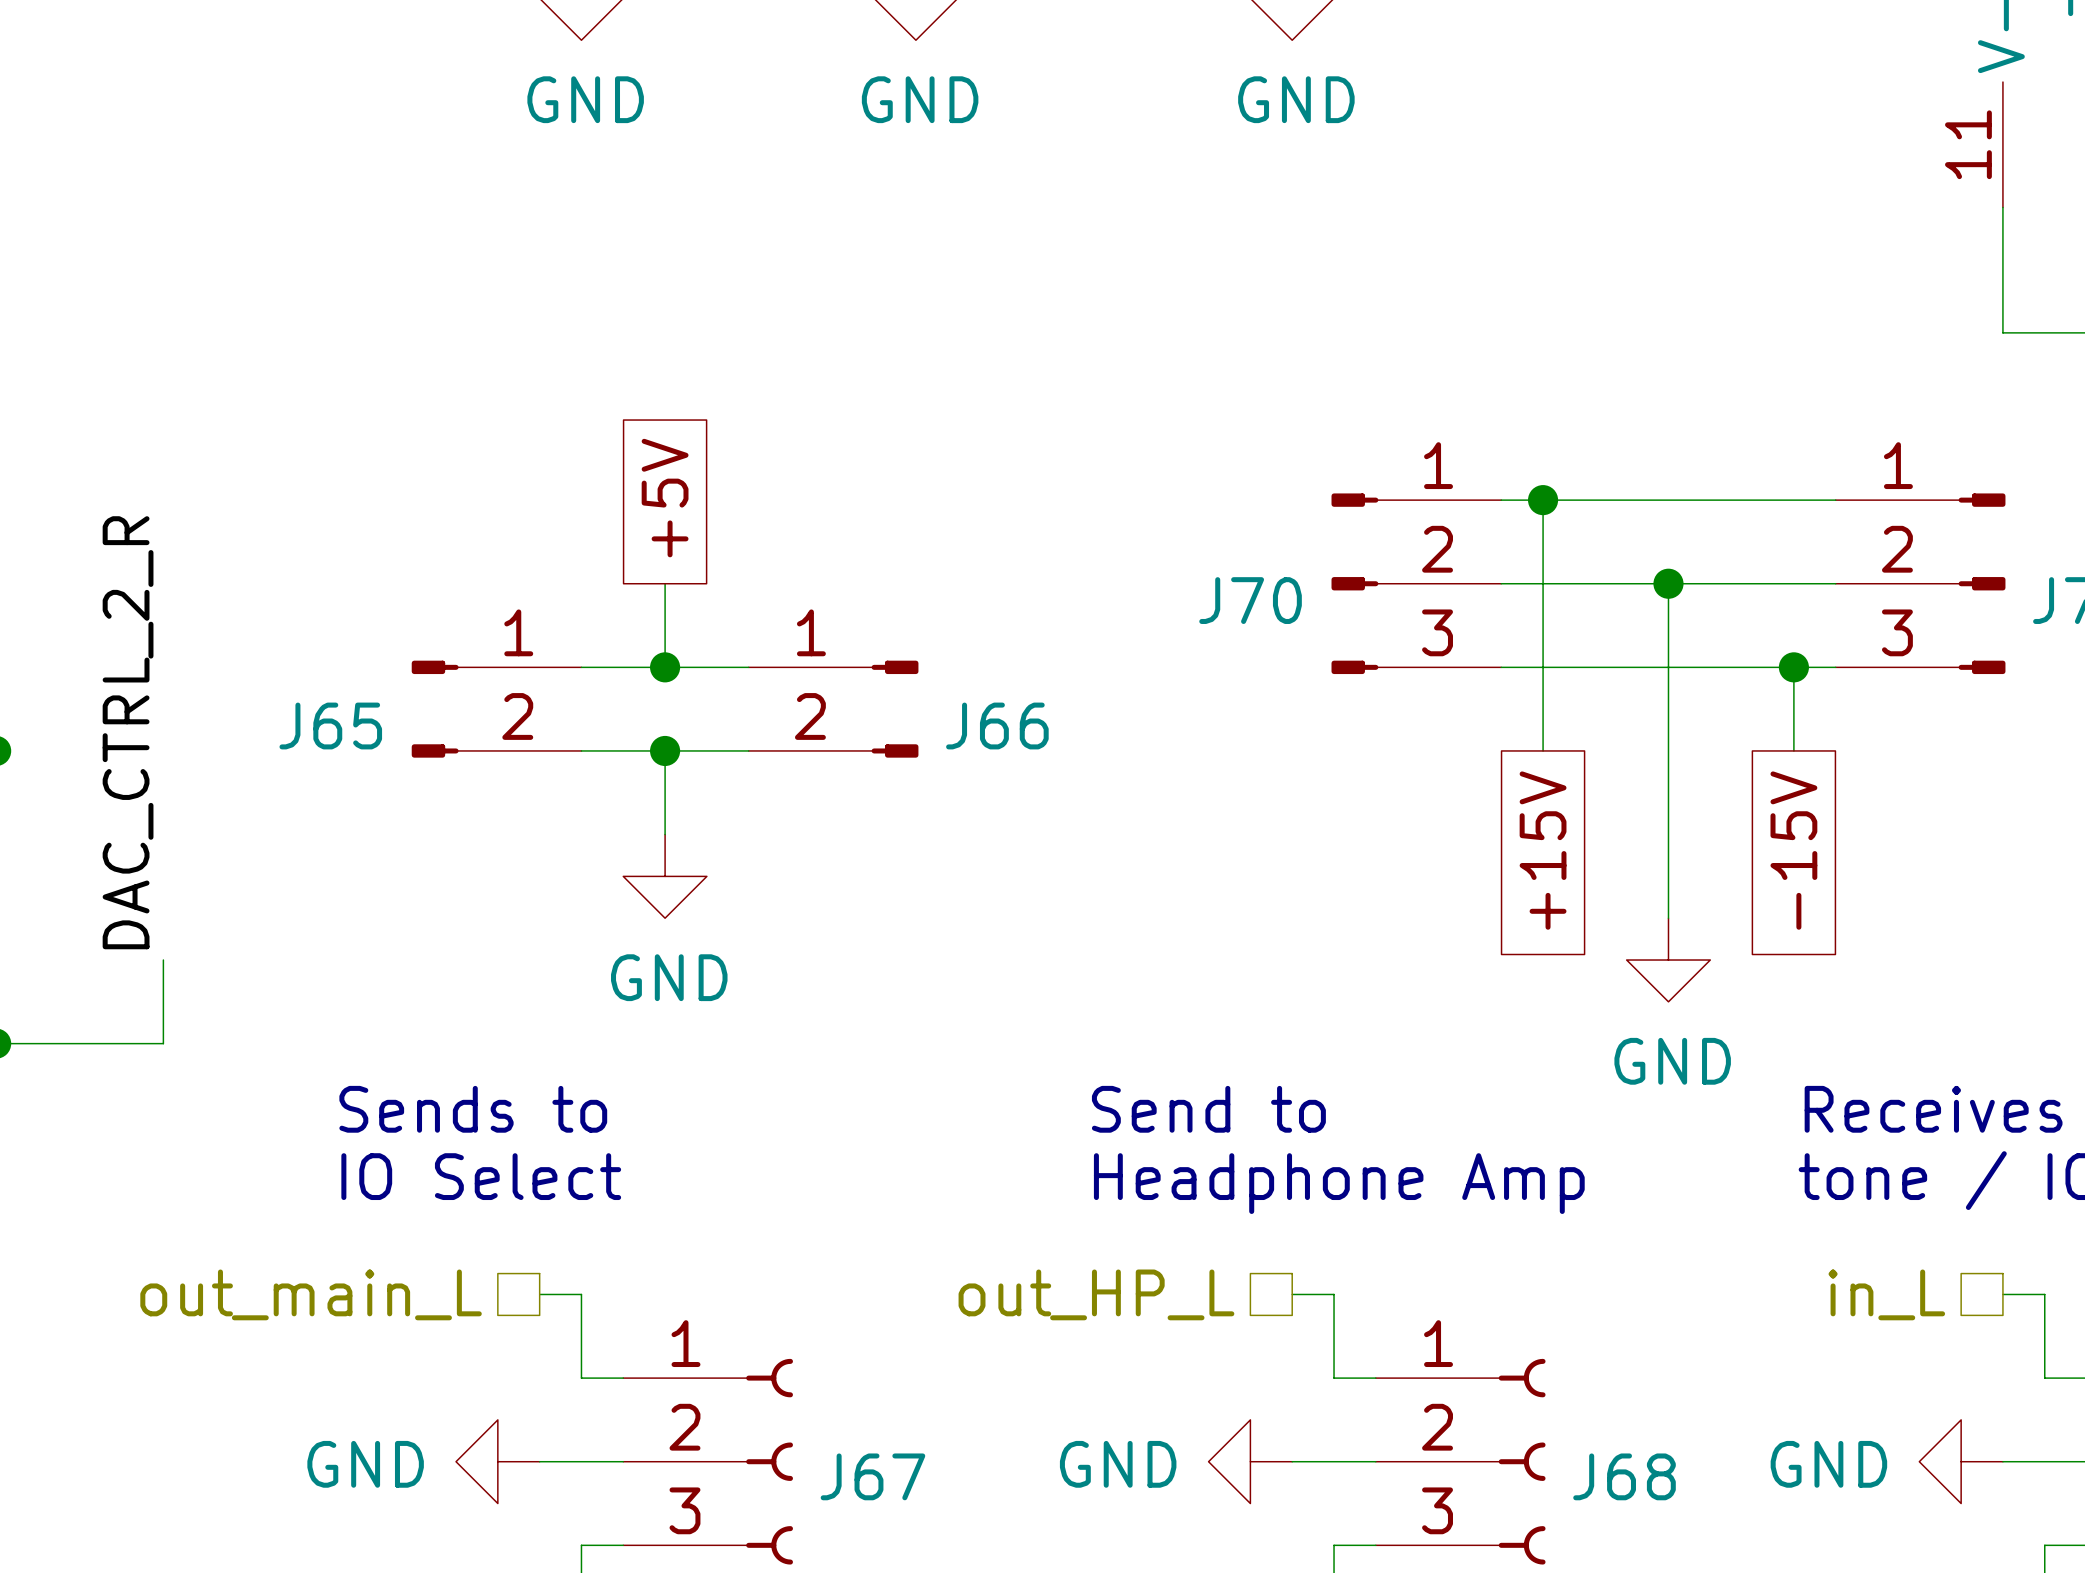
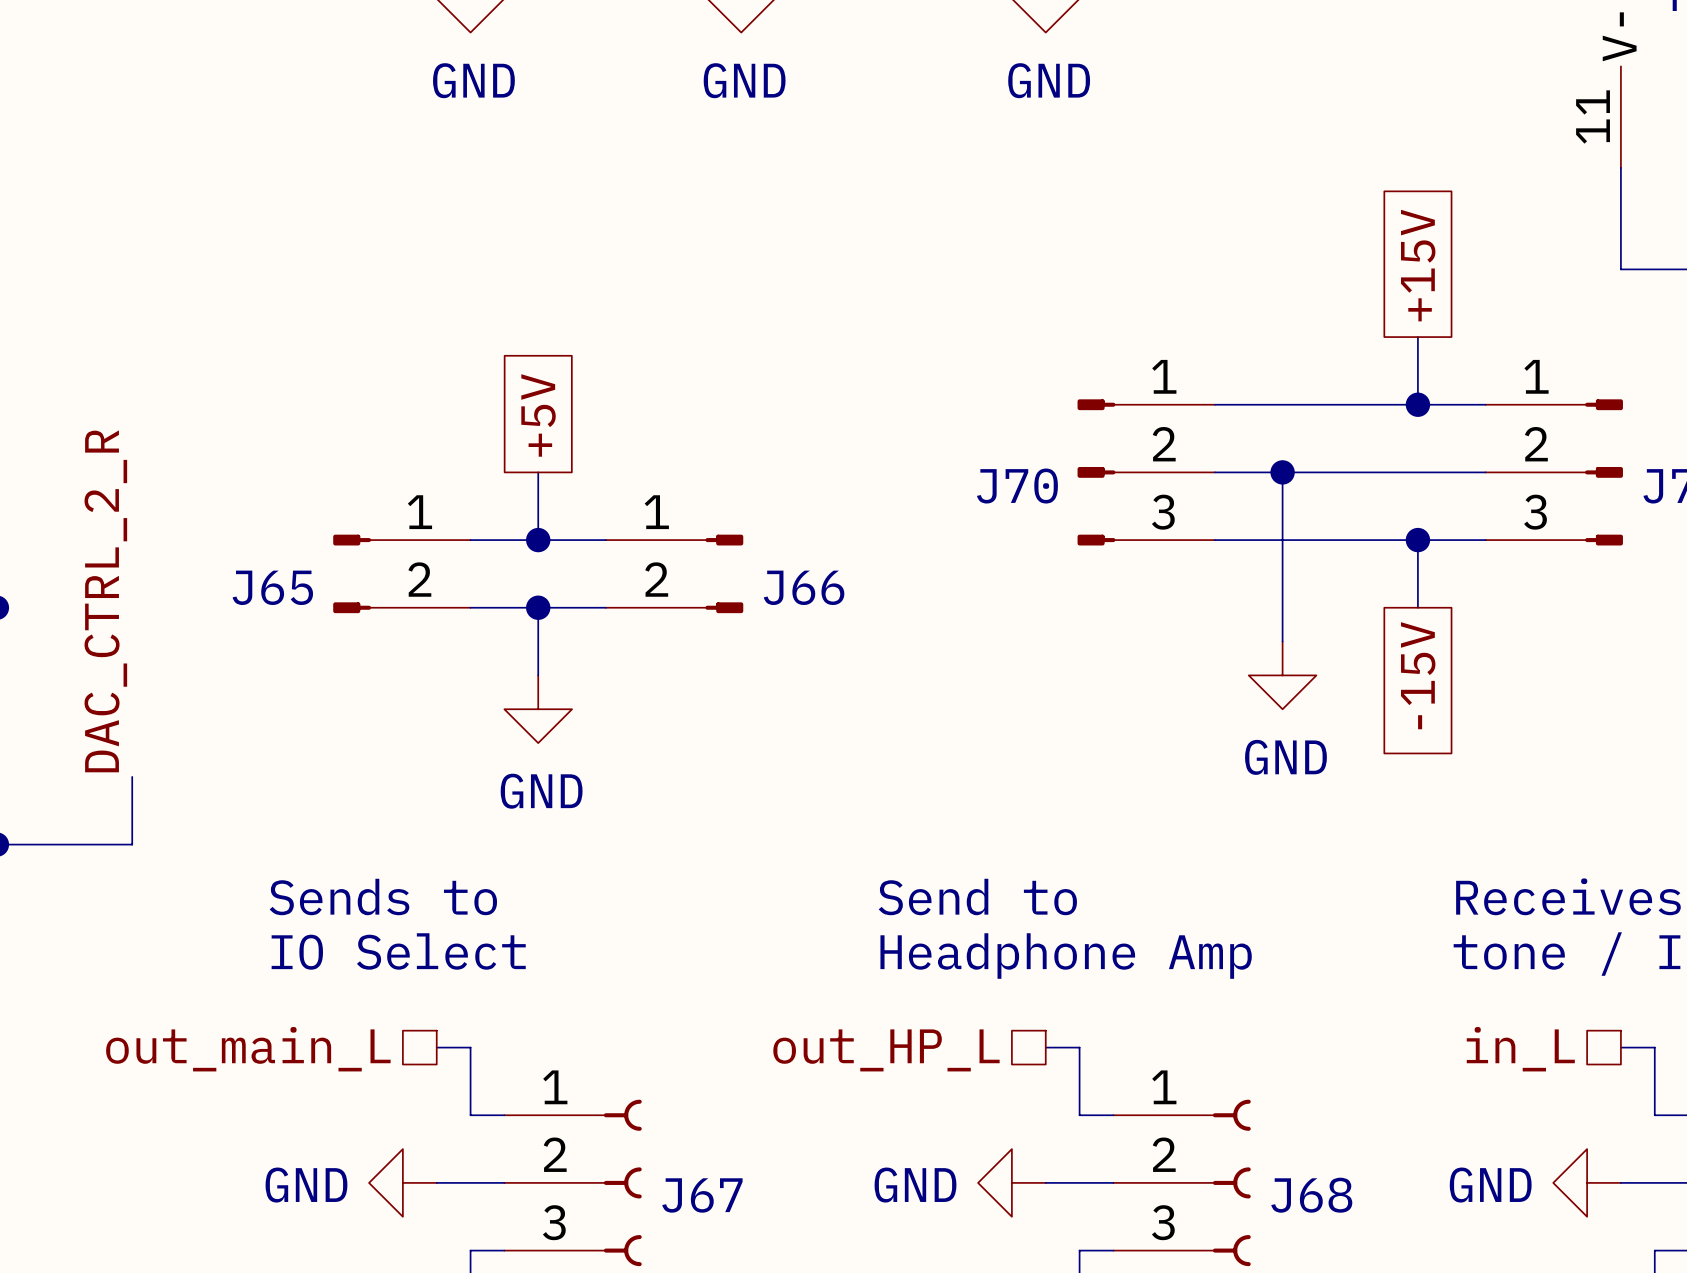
wire: none -> (1417, 337) (1417, 404)
wire: (1543, 500) (1543, 750) -> none
junction: (1543, 500) -> none
junction: none -> (1417, 404)
wire: none -> (1282, 472) (1282, 641)
junction: none -> (1282, 472)
wire: (1668, 583) (1668, 918) -> none
junction: (1668, 583) -> none
wire: (1793, 667) (1793, 750) -> (1417, 540) (1417, 607)
junction position: (1793, 667) -> (1417, 540)
global label rotation: 0° (1543, 850) -> 180° (1418, 265)
global label position: +15V (1543, 850) -> +15V (1418, 265)
global label position: -15V (1793, 850) -> -15V (1418, 675)
power symbol position: GND (1668, 960) -> GND (1282, 675)

